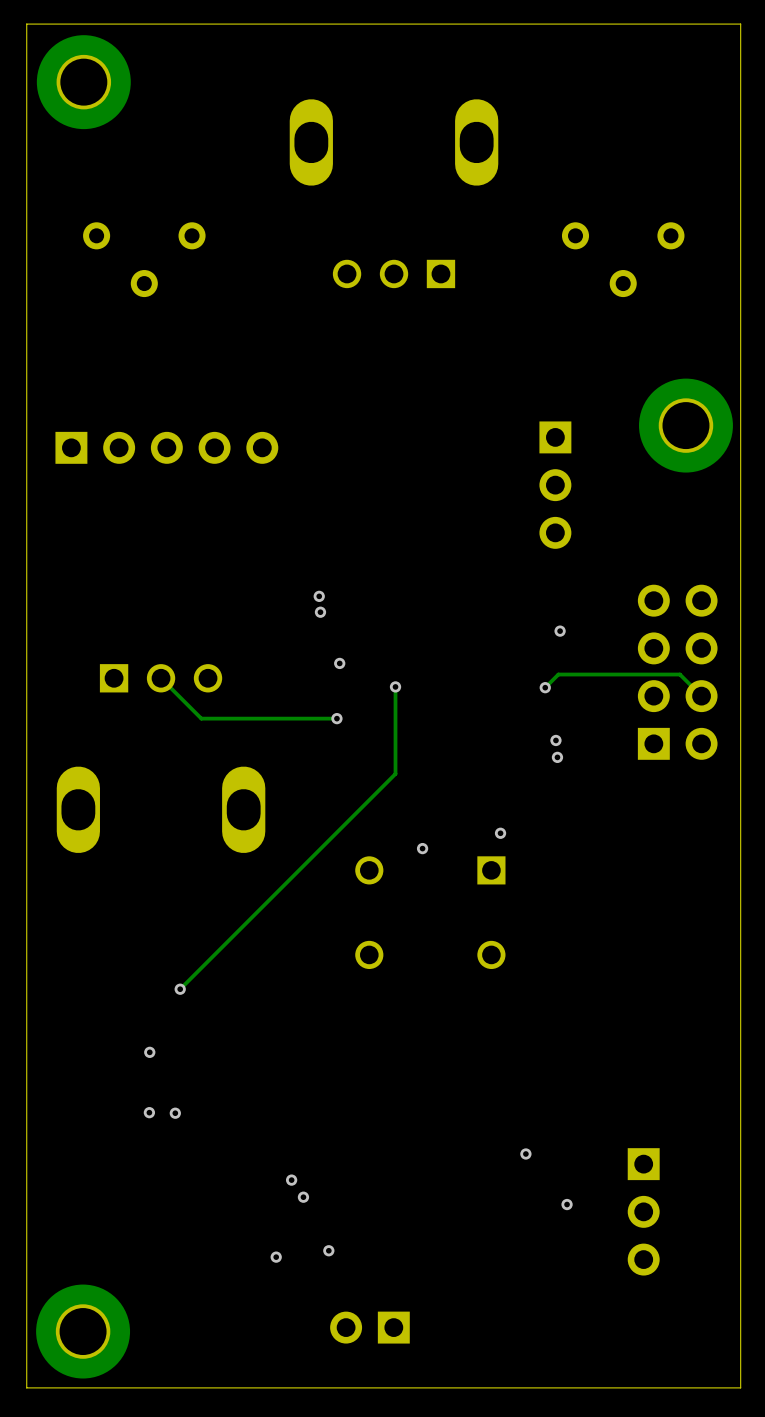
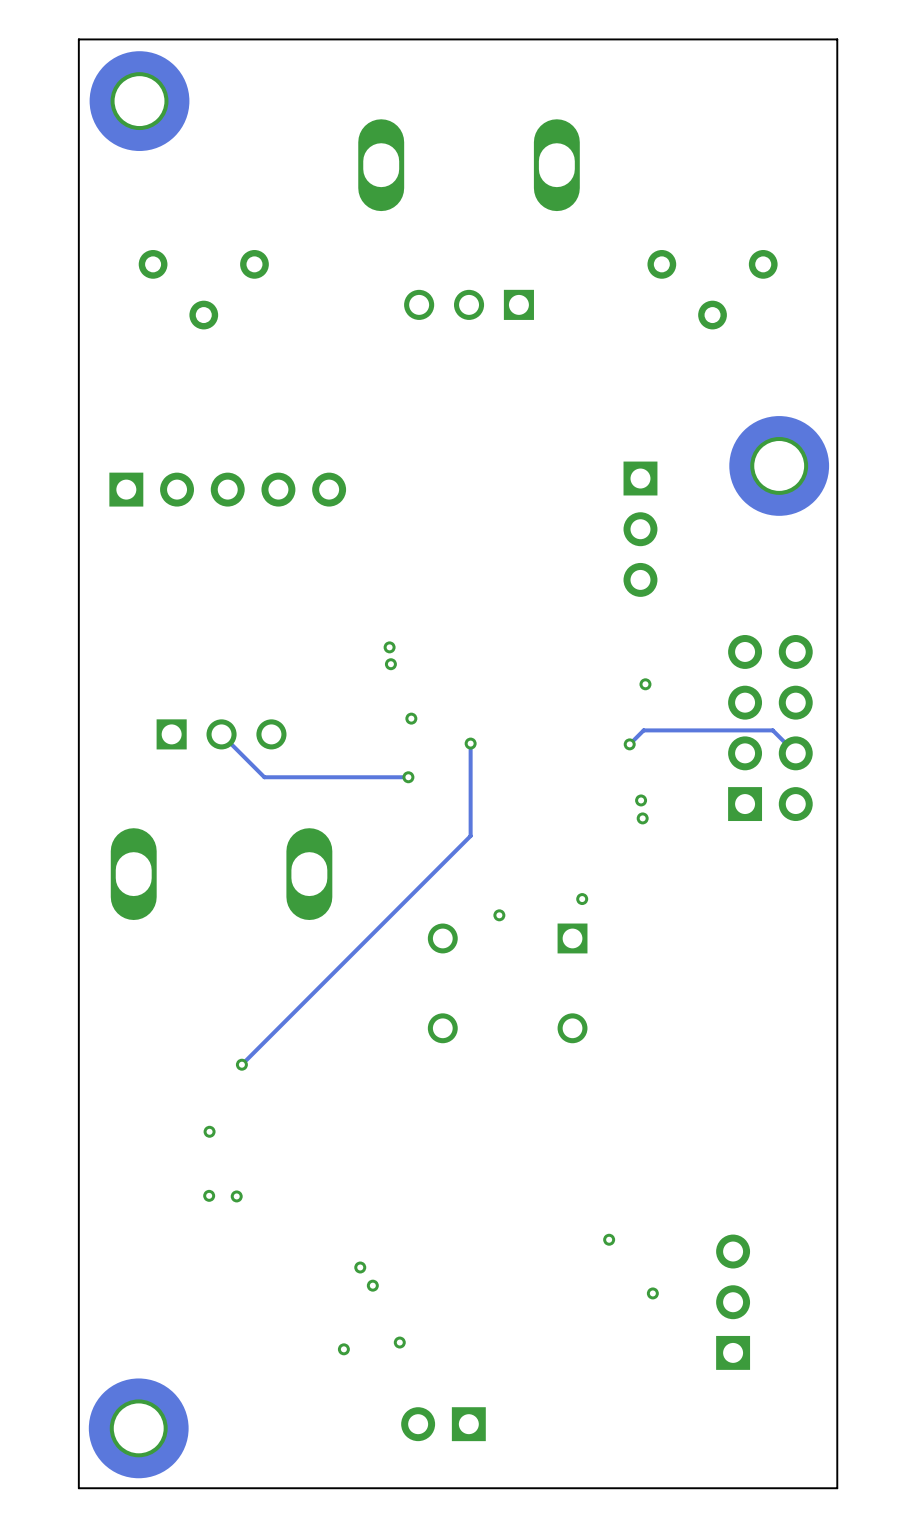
part rotation: 0° (643, 1211) -> 180° (733, 1302)

